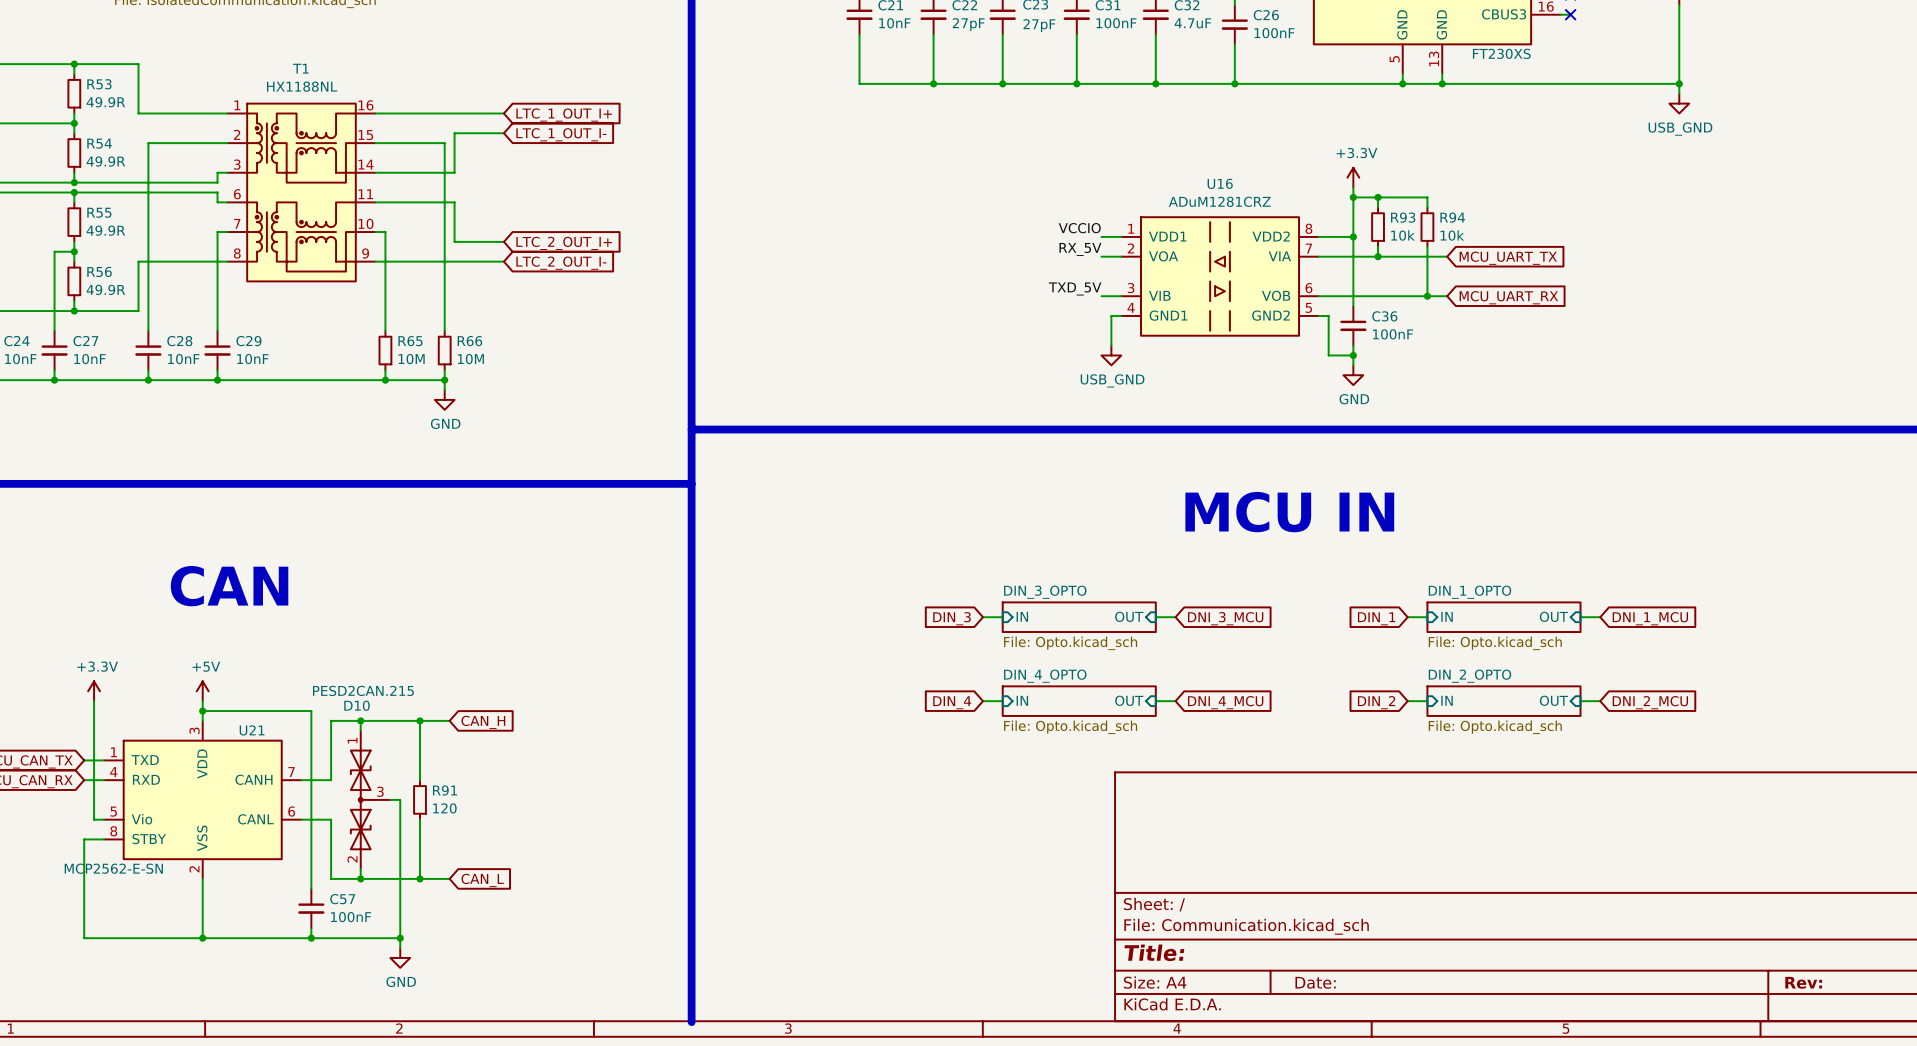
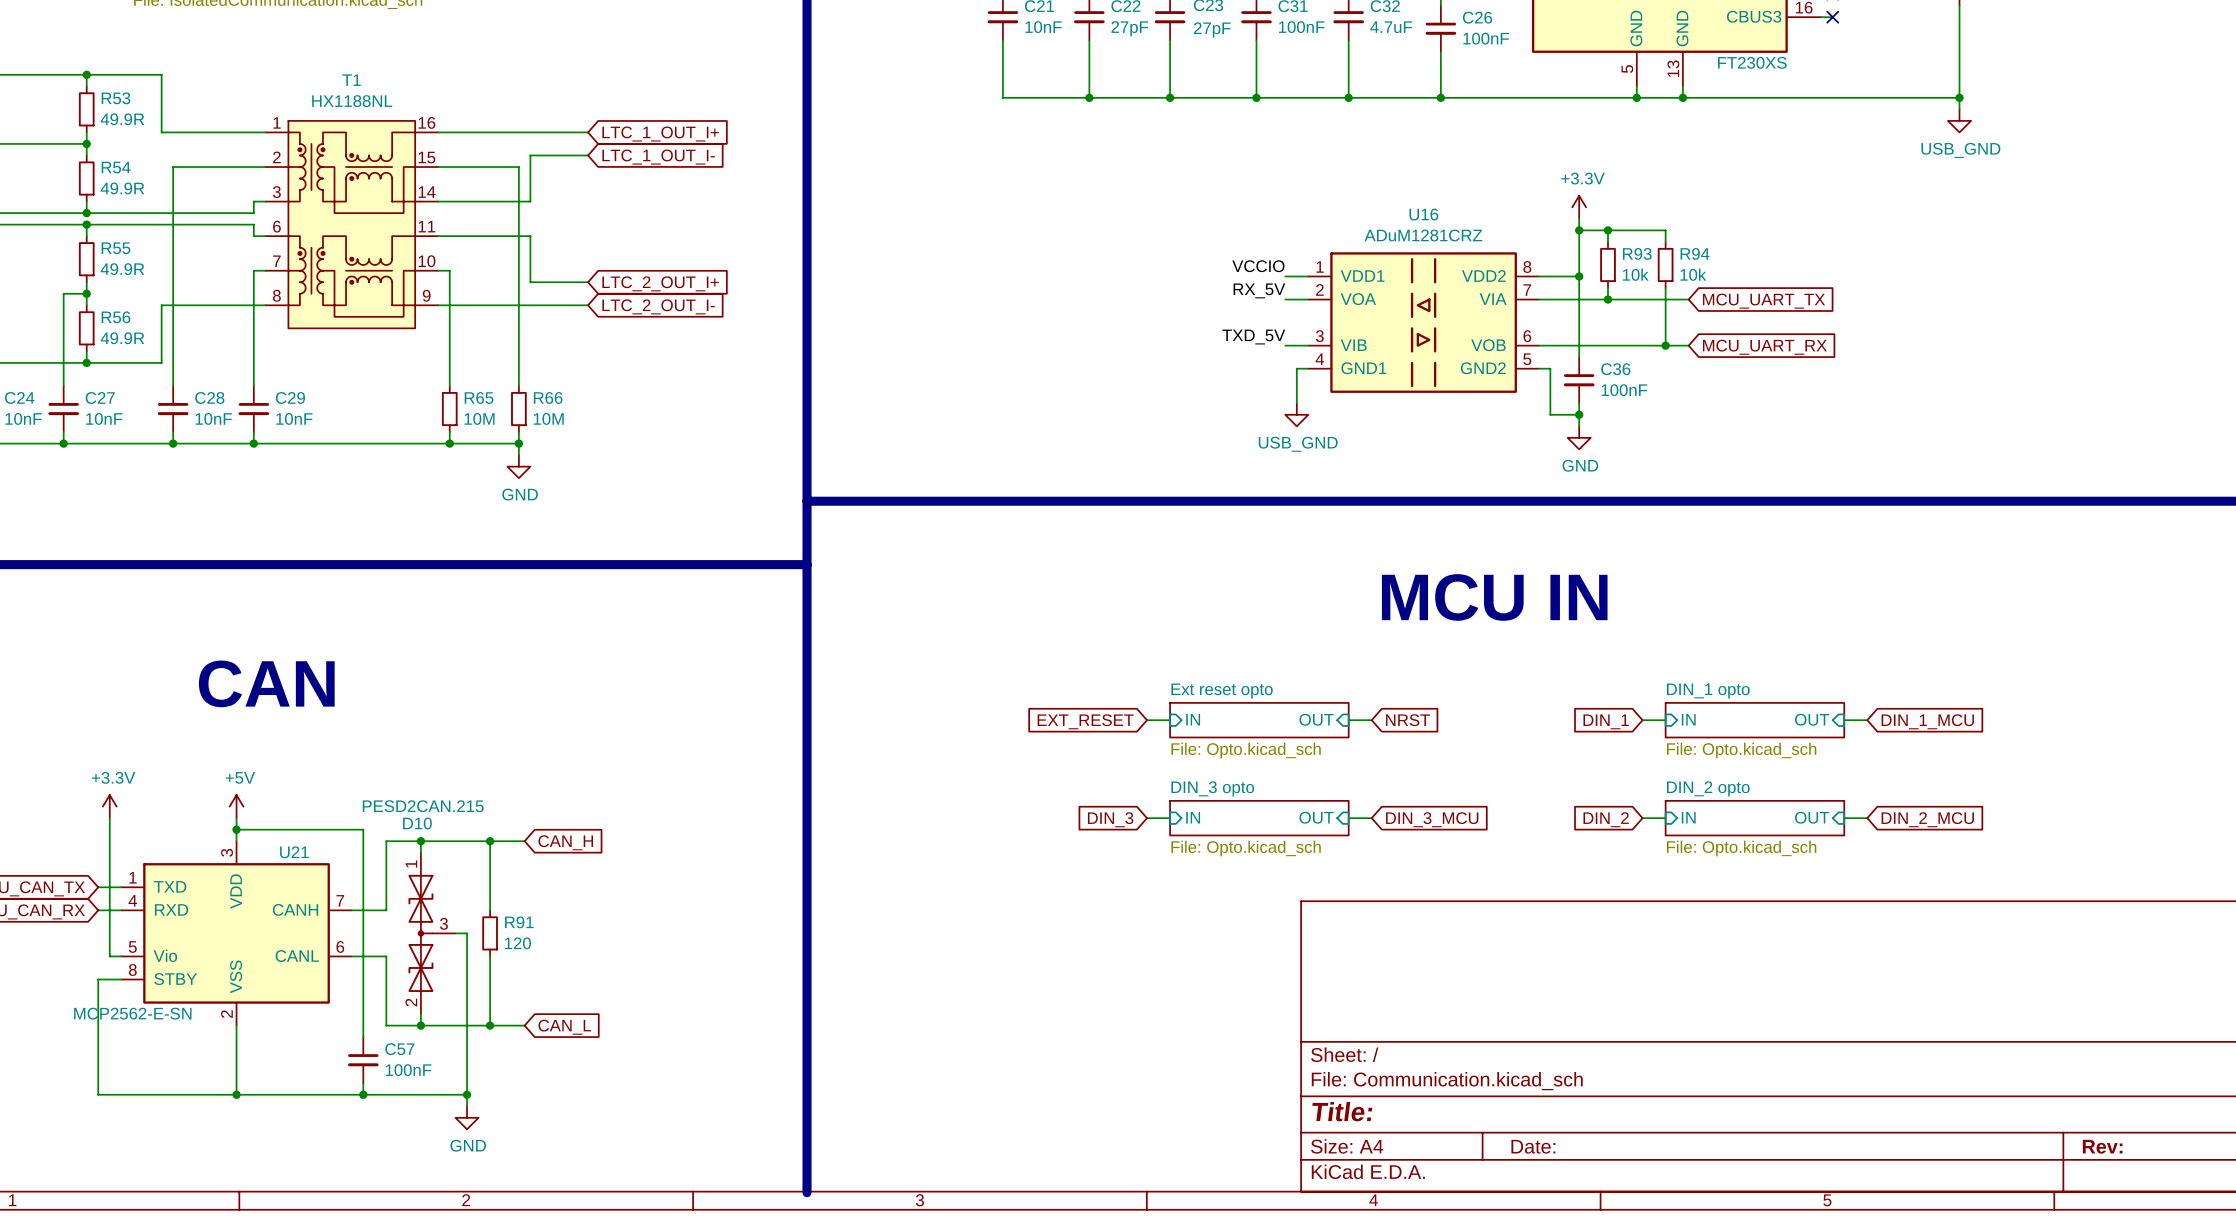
sheet DIN_3_OPTO name: DIN_3_OPTO (1045, 592) -> Ext reset opto (1222, 691)
sheet DIN_1_OPTO name: DIN_1_OPTO (1469, 592) -> DIN_1 opto (1708, 691)
global label: DIN_3 (952, 618) -> EXT_RESET (1085, 721)
global label: DNI_3_MCU (1225, 618) -> NRST (1408, 720)
global label: DNI_1_MCU (1650, 618) -> DIN_1_MCU (1927, 721)
sheet DIN_4_OPTO name: DIN_4_OPTO (1045, 676) -> DIN_3 opto (1212, 788)
sheet DIN_2_OPTO name: DIN_2_OPTO (1469, 676) -> DIN_2 opto (1708, 788)
global label: DIN_4 (952, 702) -> DIN_3 (1110, 819)
global label: DNI_4_MCU (1225, 702) -> DIN_3_MCU (1432, 819)
global label: DNI_2_MCU (1650, 702) -> DIN_2_MCU (1927, 819)

